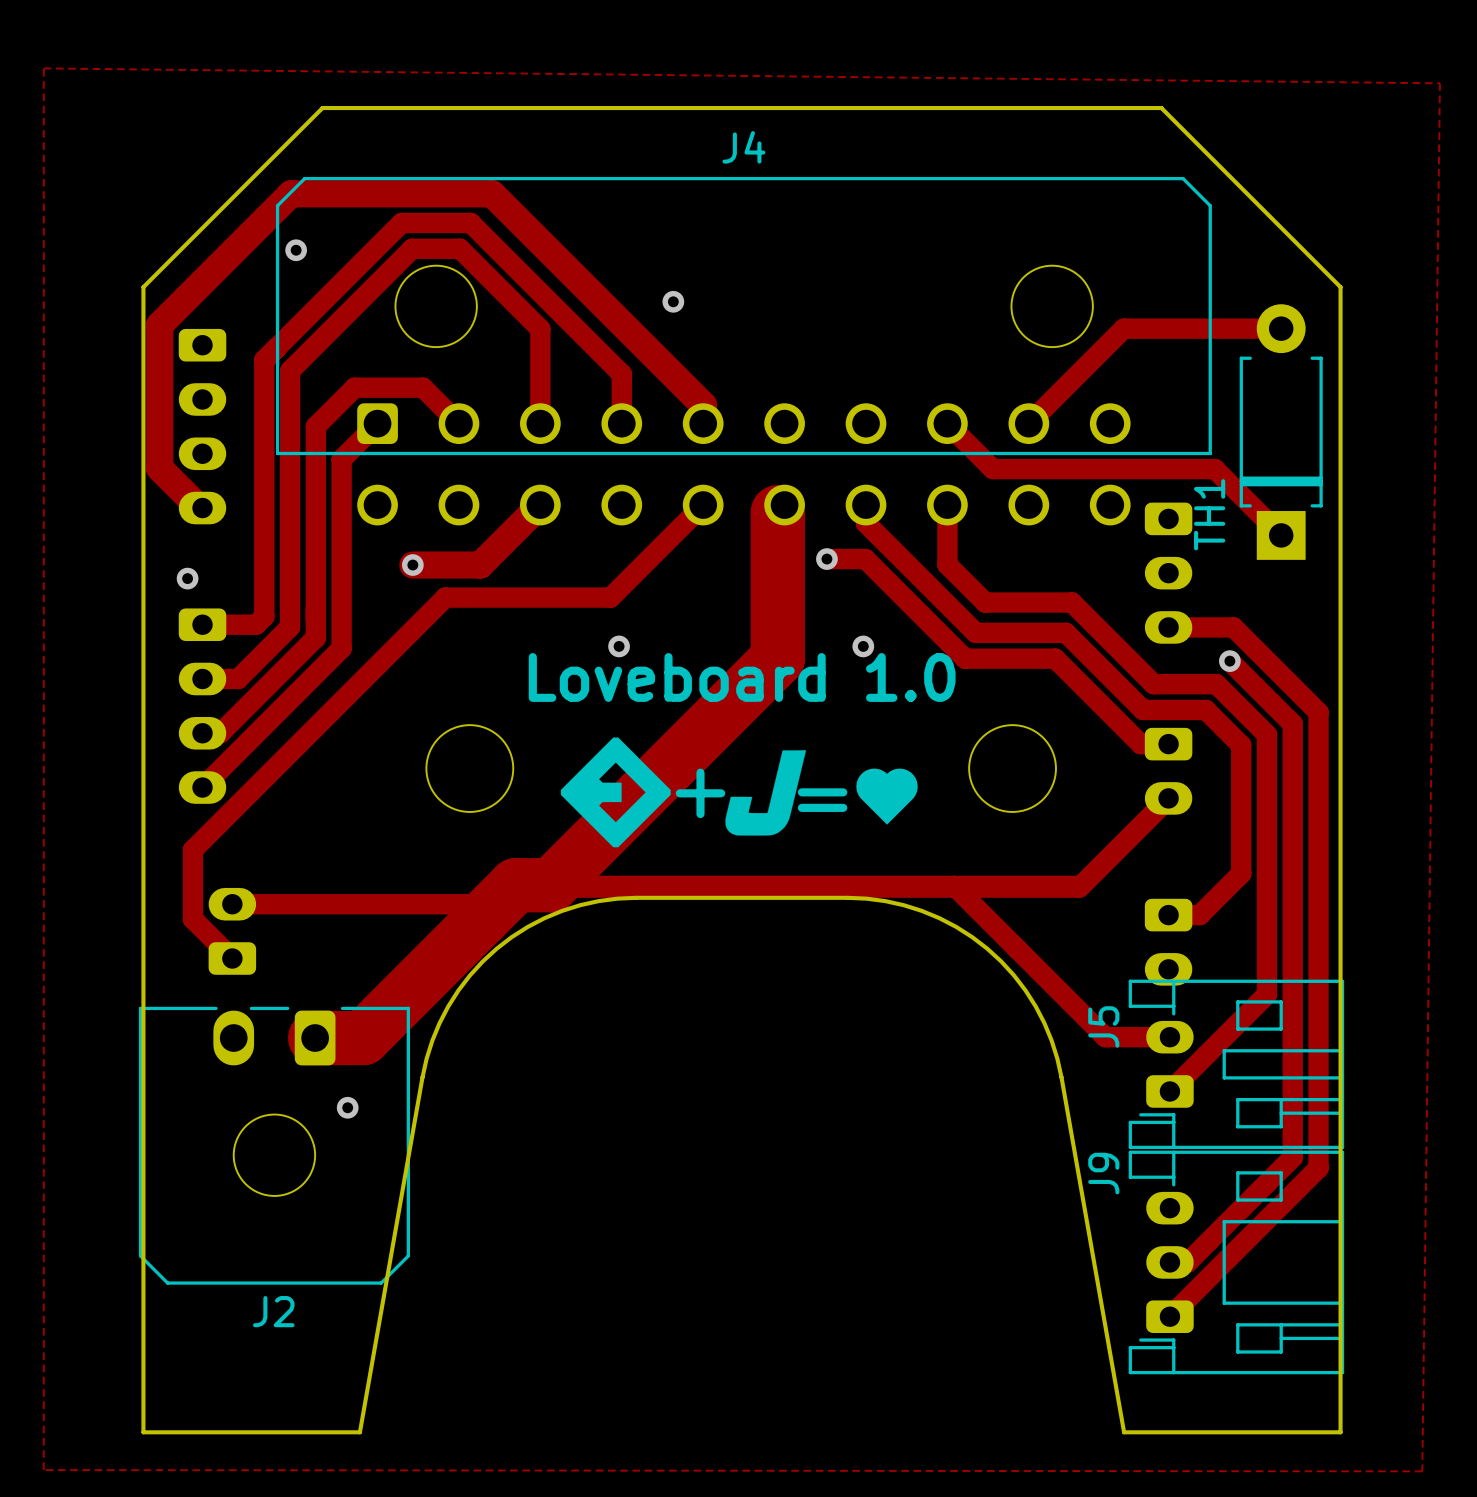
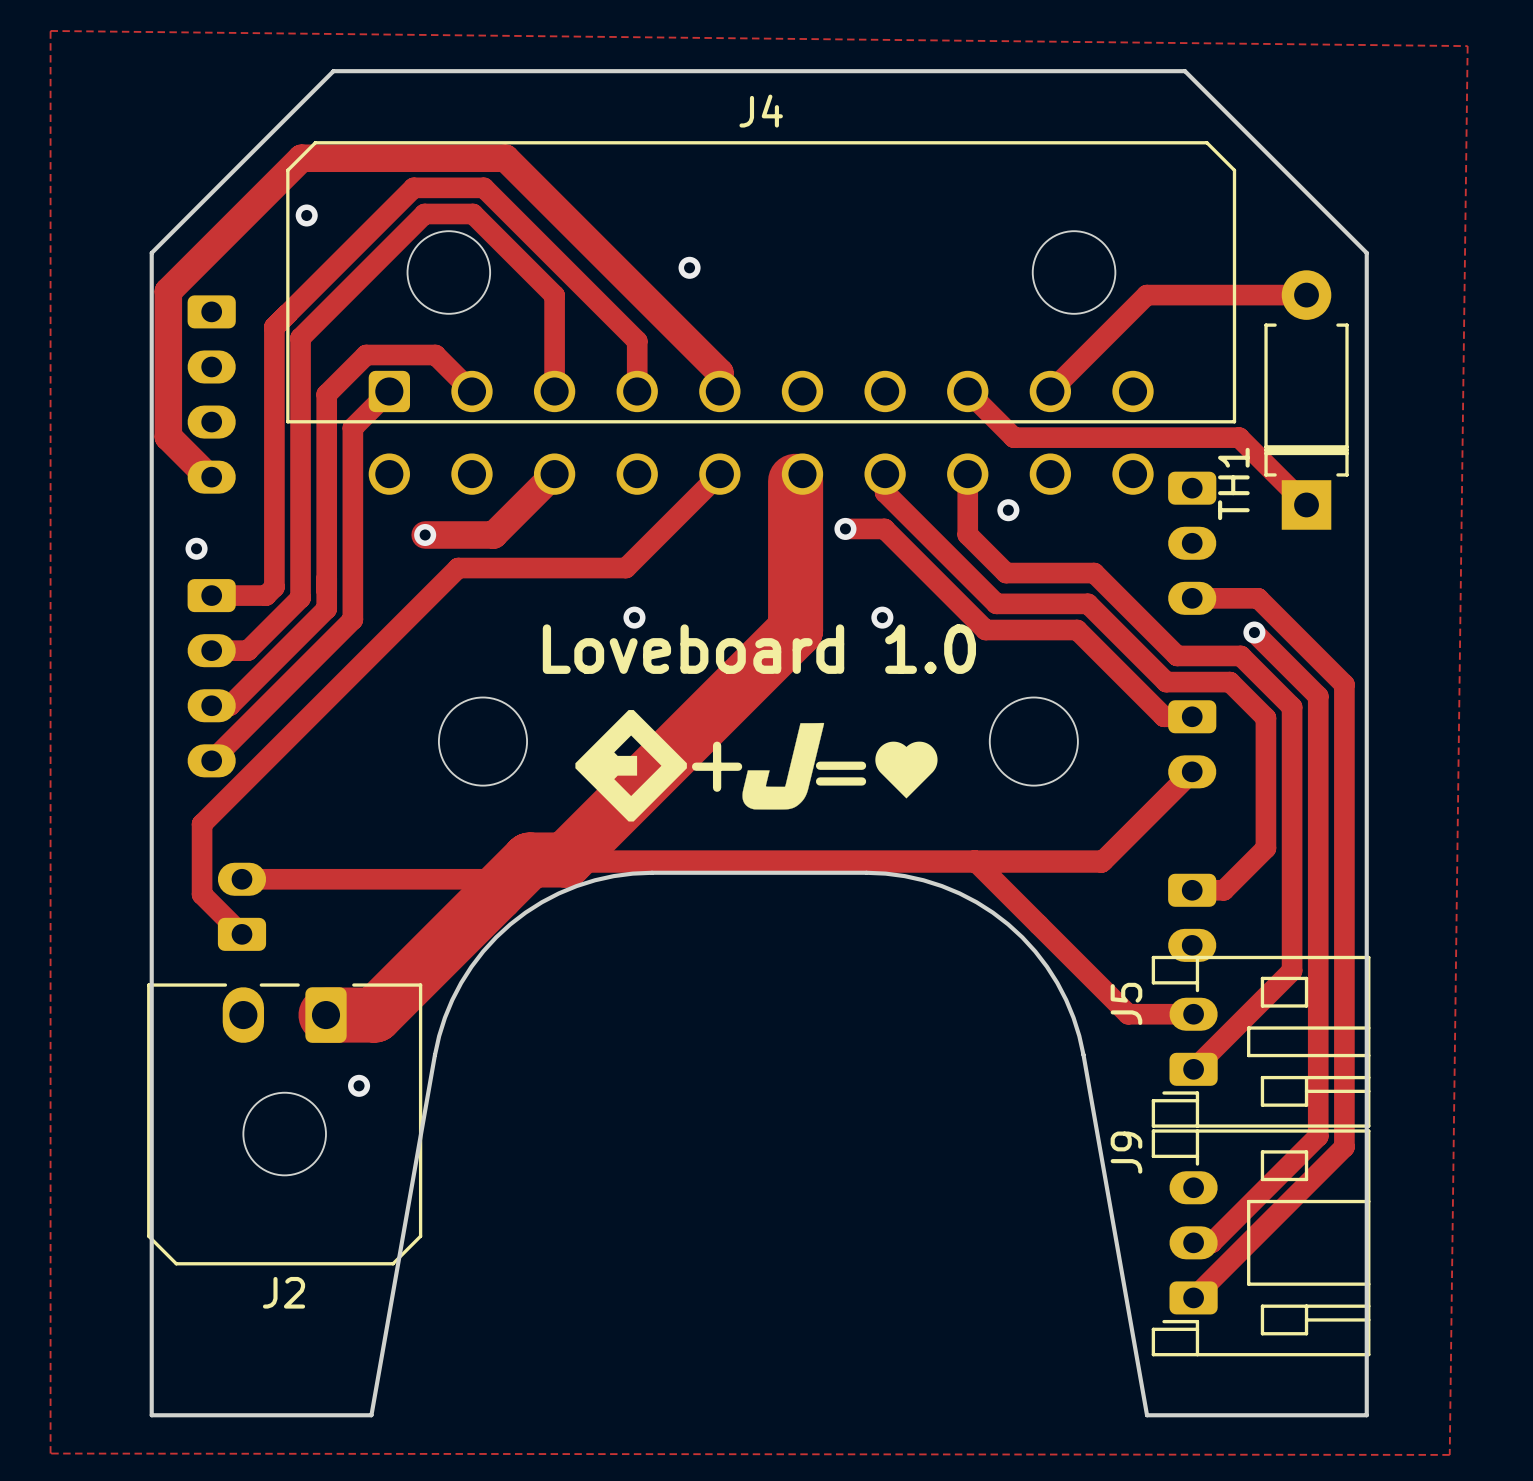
via: none -> (1008, 510)

